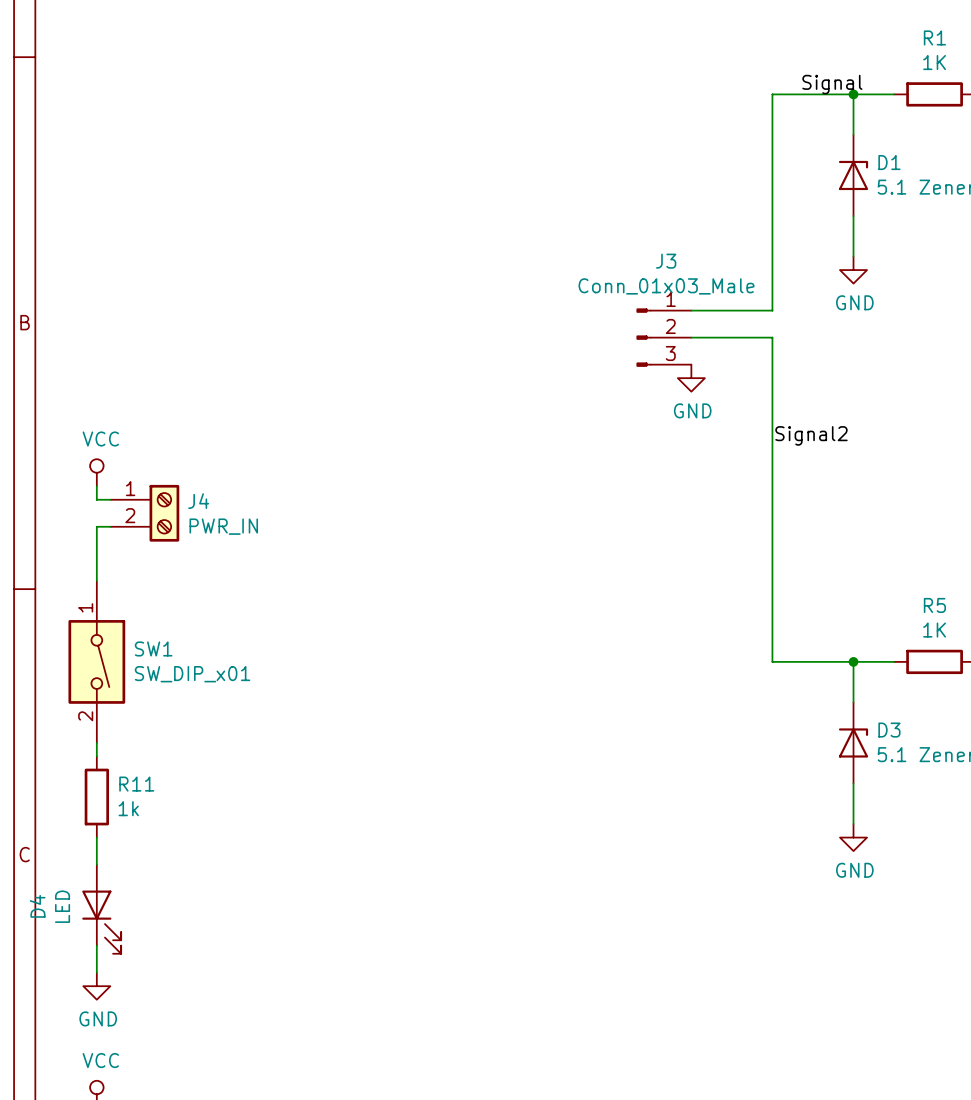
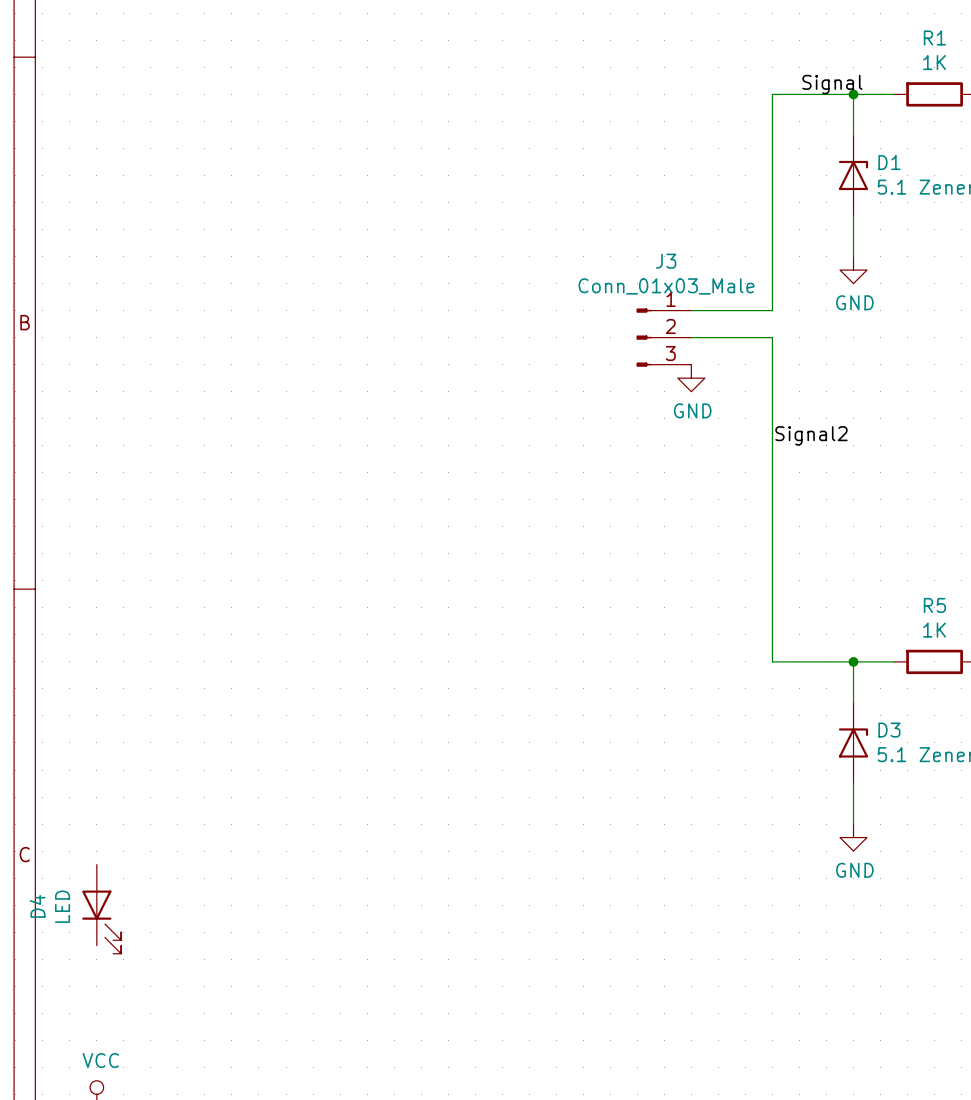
power symbol: VCC (96, 472) -> none
wire: (96, 486) (96, 499) (110, 499) -> none
J4: PWR_IN (144, 513) -> none
wire: (110, 526) (96, 526) (96, 580) -> none
SW1: SW_DIP_x01 (96, 661) -> none
wire: (96, 742) (96, 756) -> none
R11: 1k (96, 797) -> none
wire: (96, 837) (96, 864) -> none
wire: (96, 945) (96, 972) -> none
power symbol: GND (96, 986) -> none

